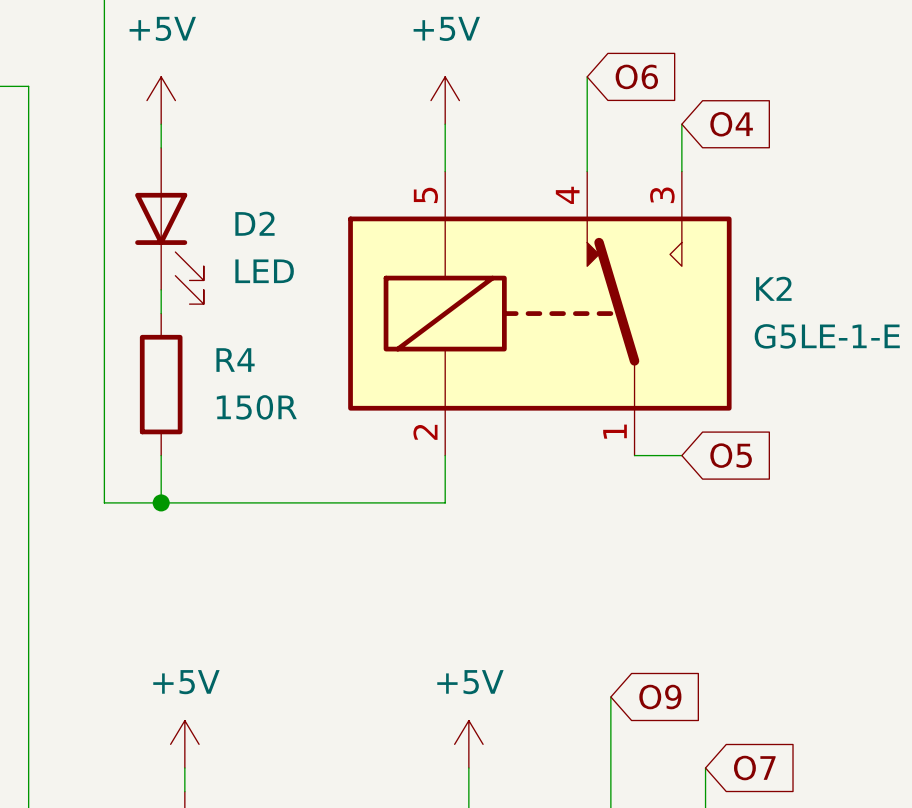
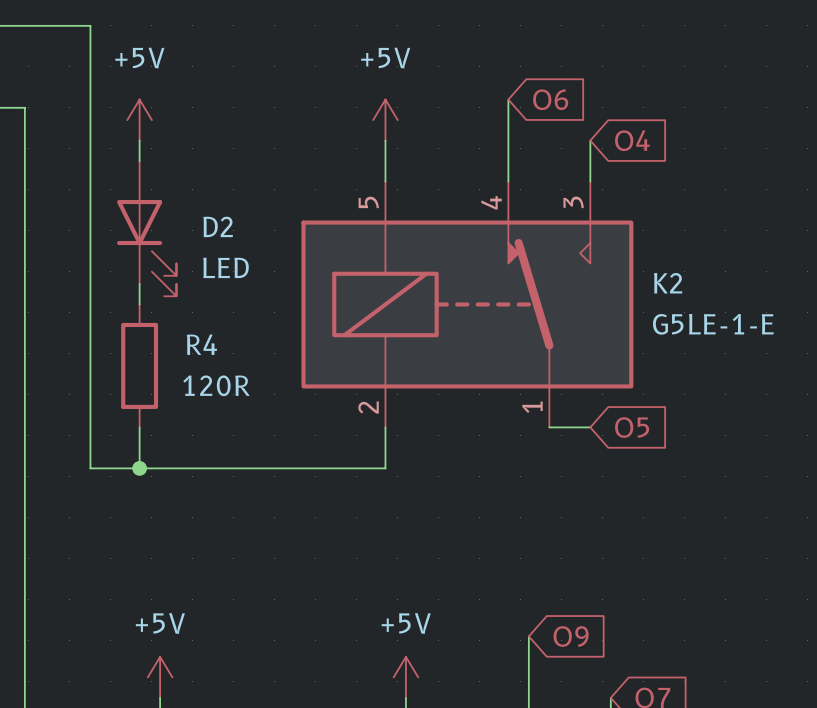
R4 value: 150R (256, 407) -> 120R (216, 385)

